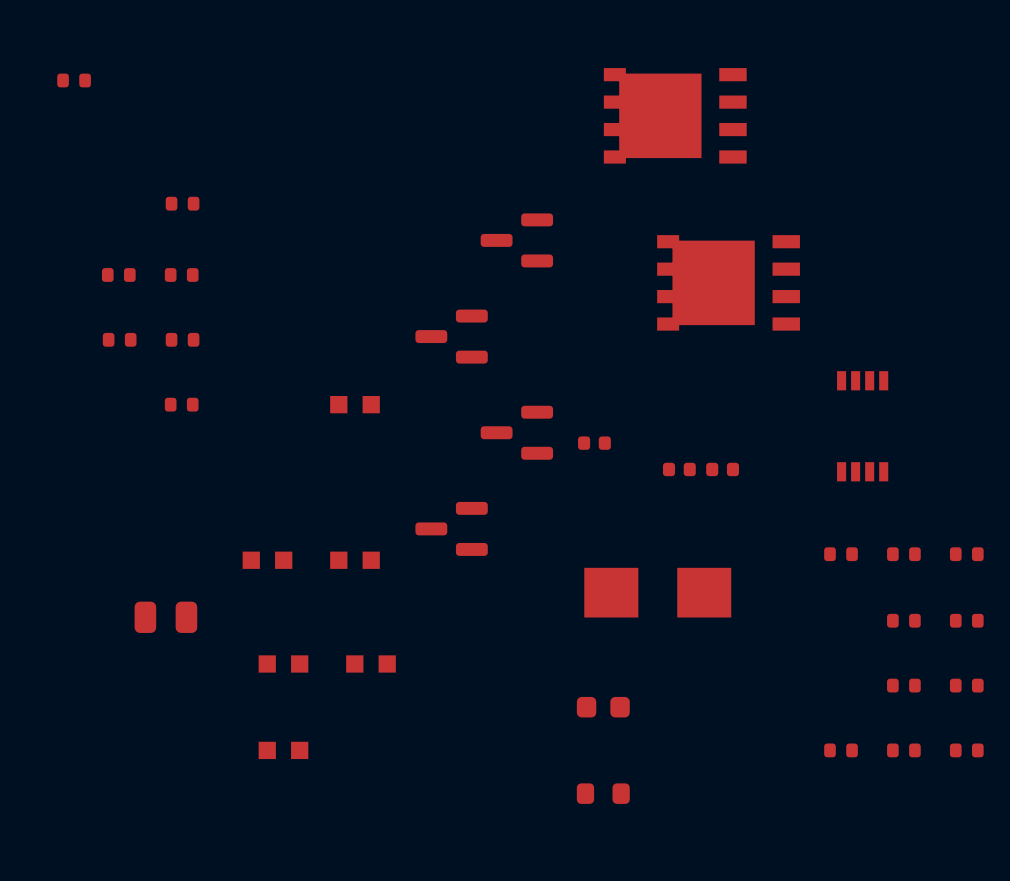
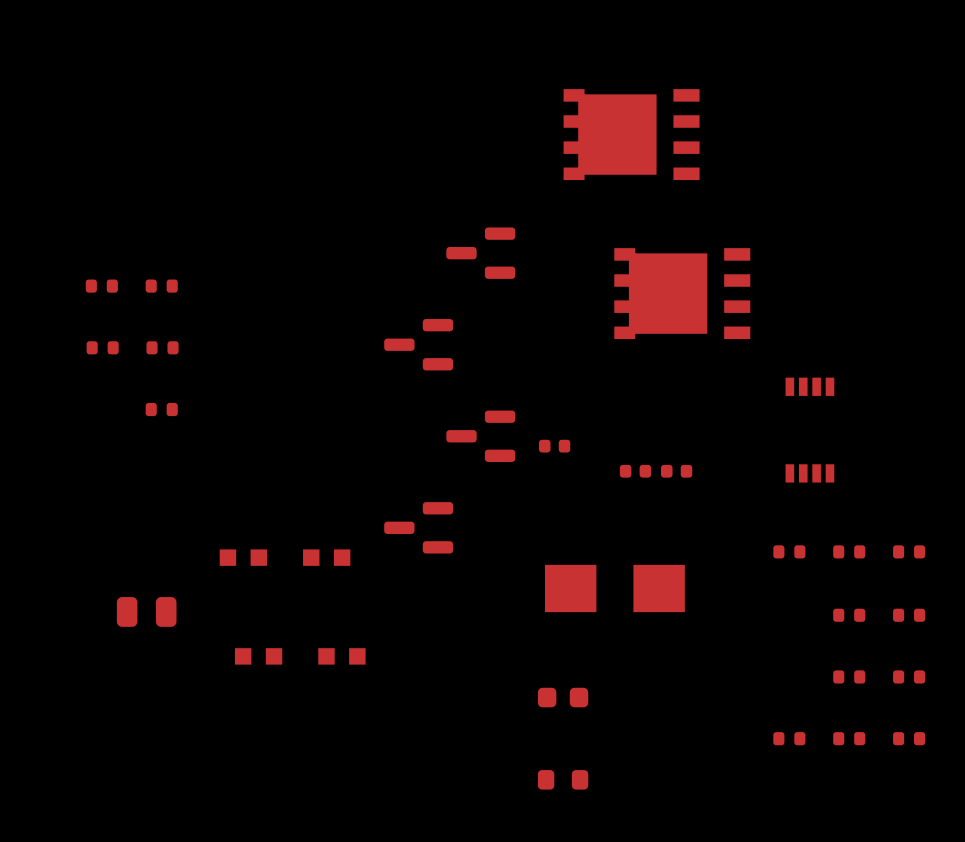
part: (74, 80) -> none
part: (182, 203) -> none
part: (355, 404) -> none
part: (283, 750) -> none

